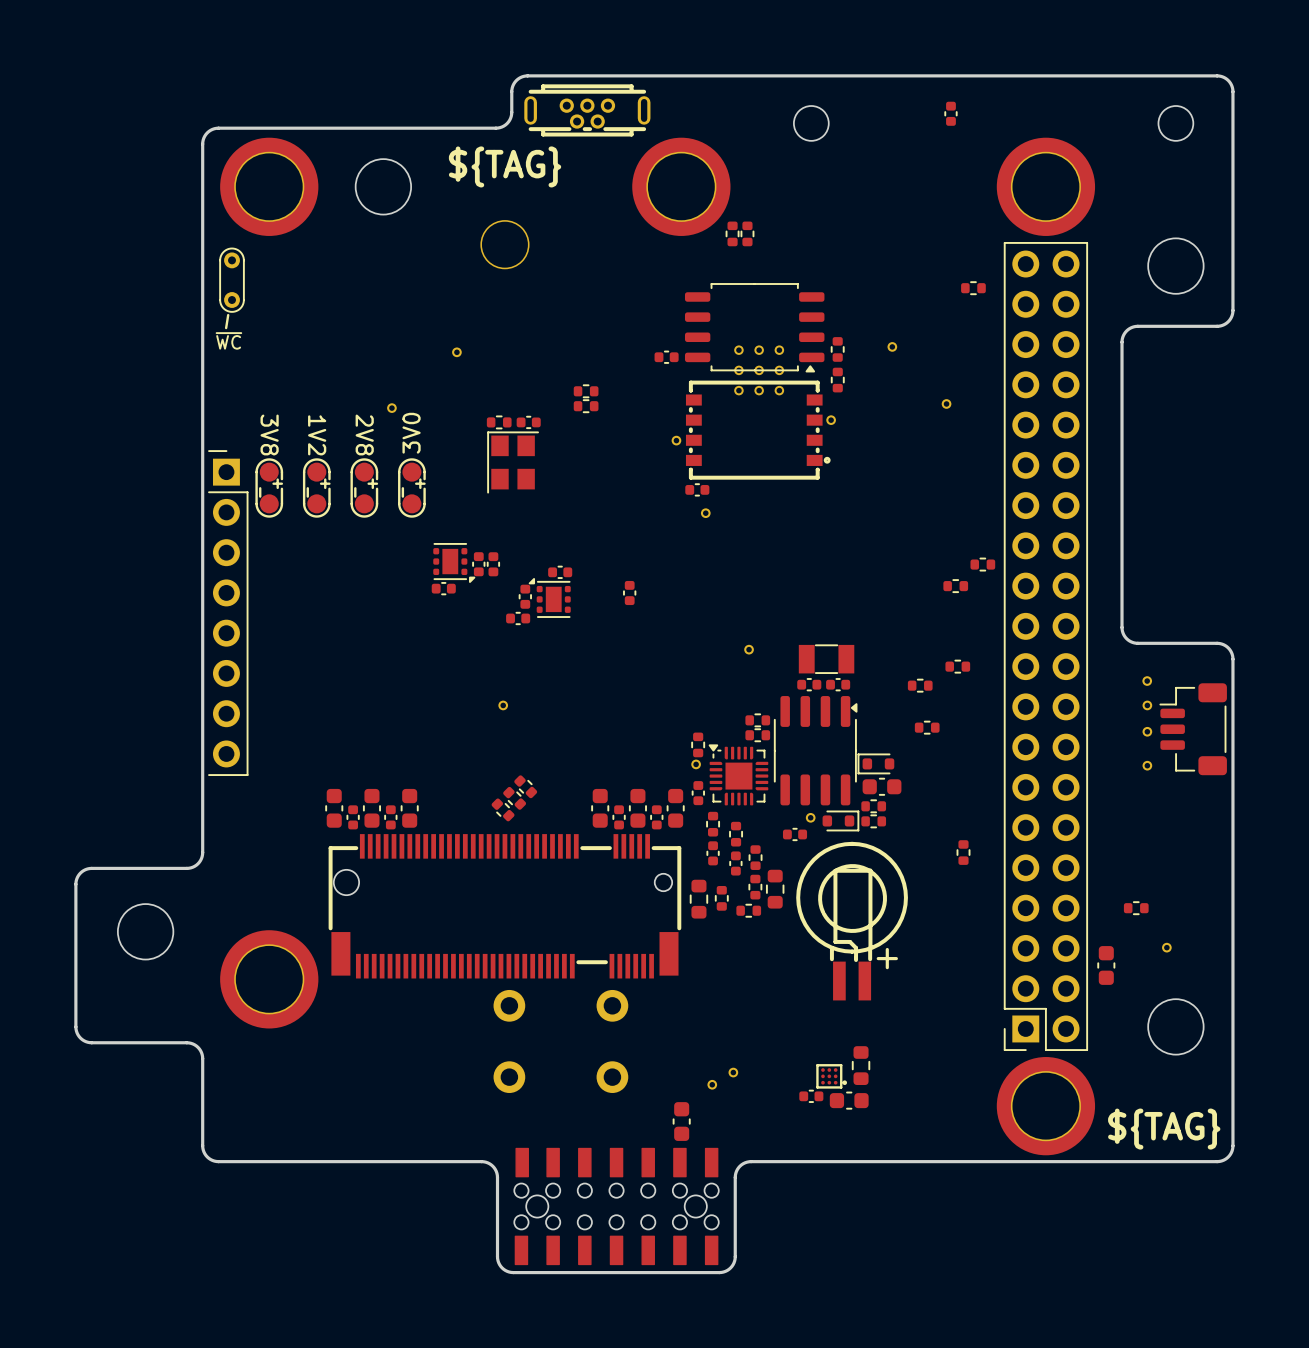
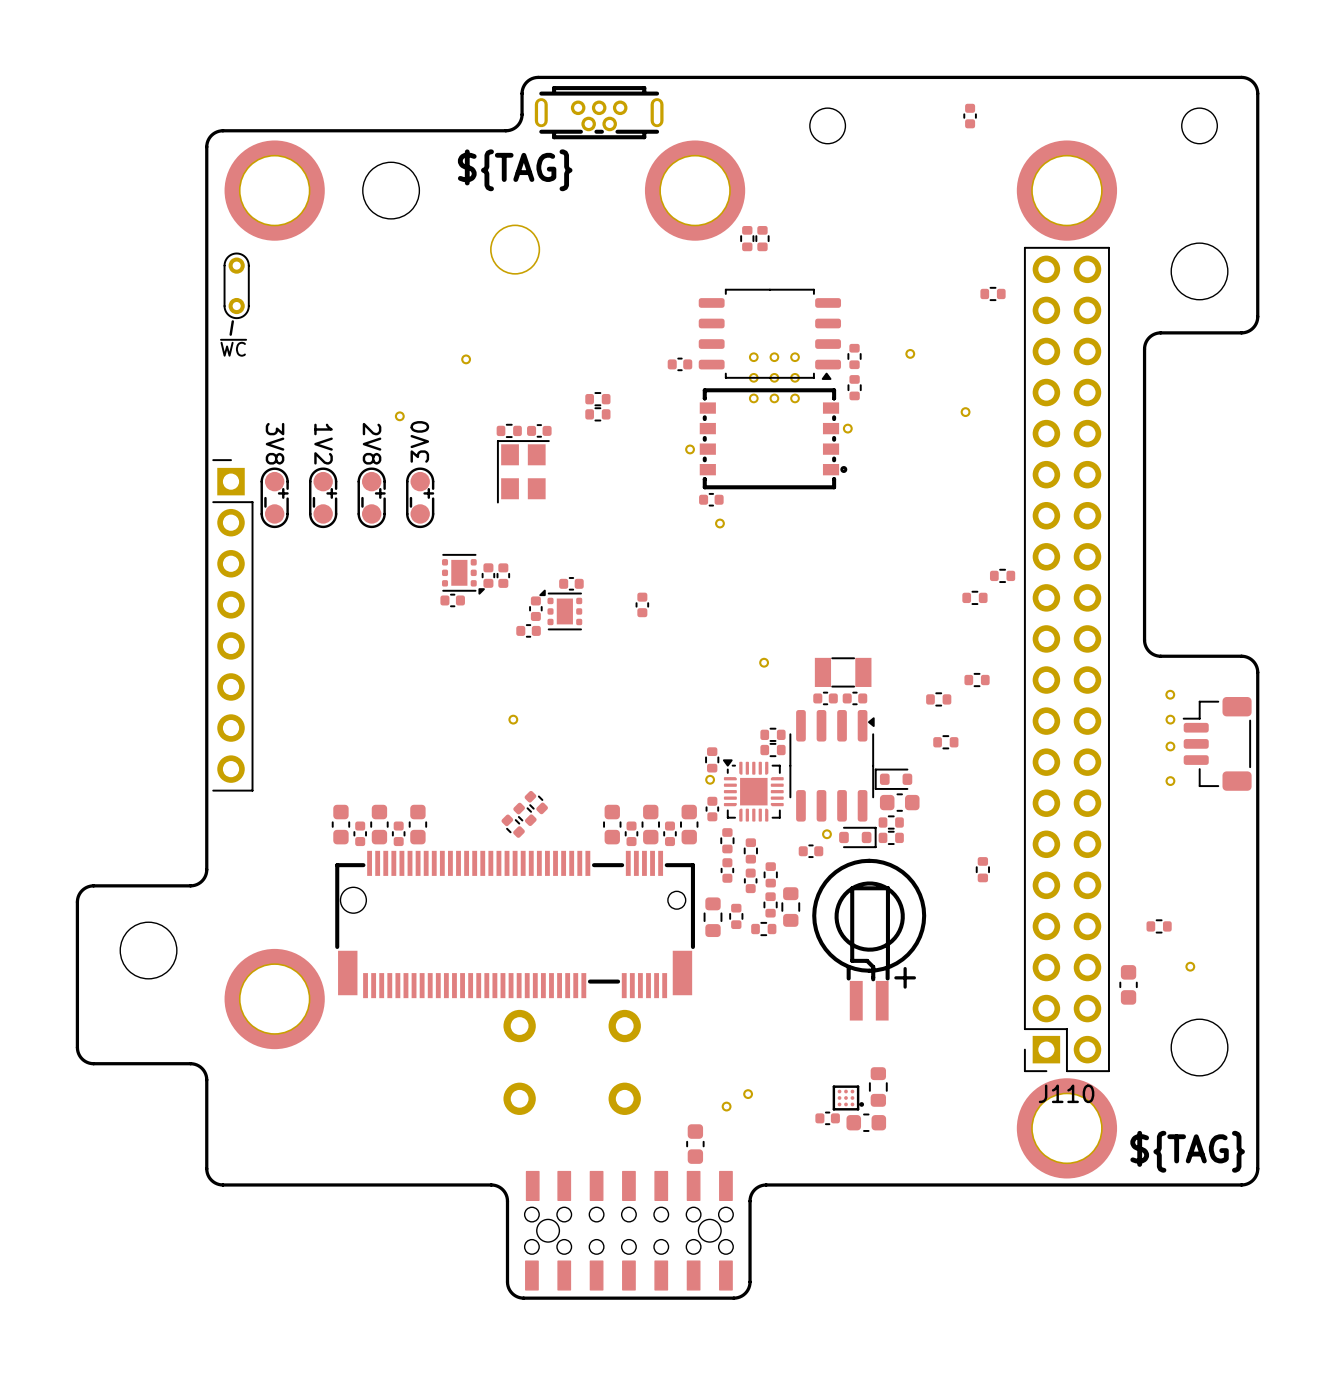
J110 name: none -> J110 (1066, 1093)

